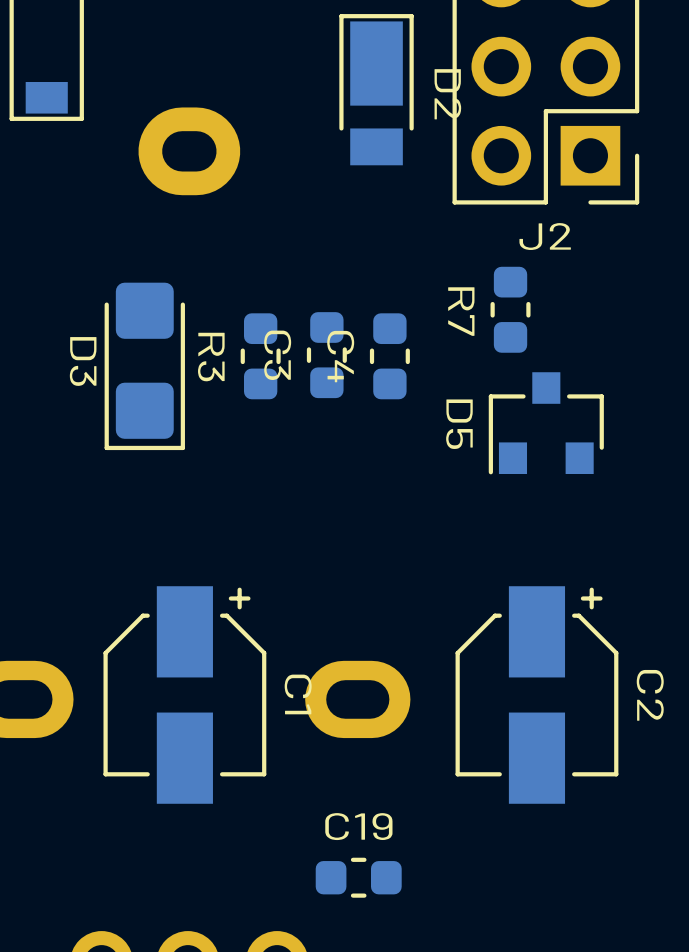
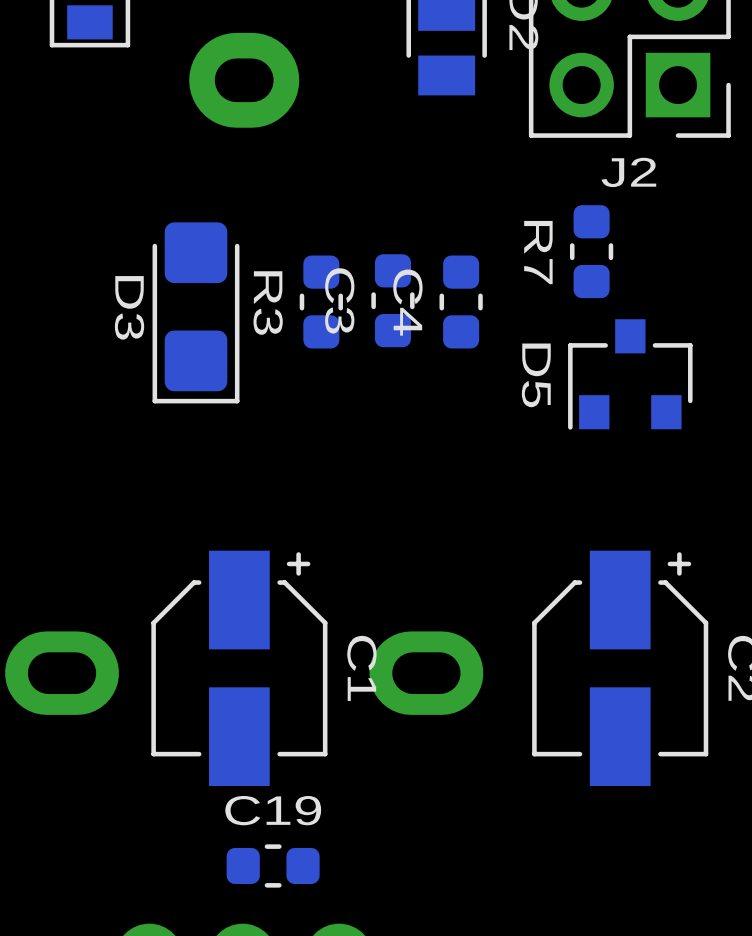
C19 position: (358, 877) -> (273, 865)

